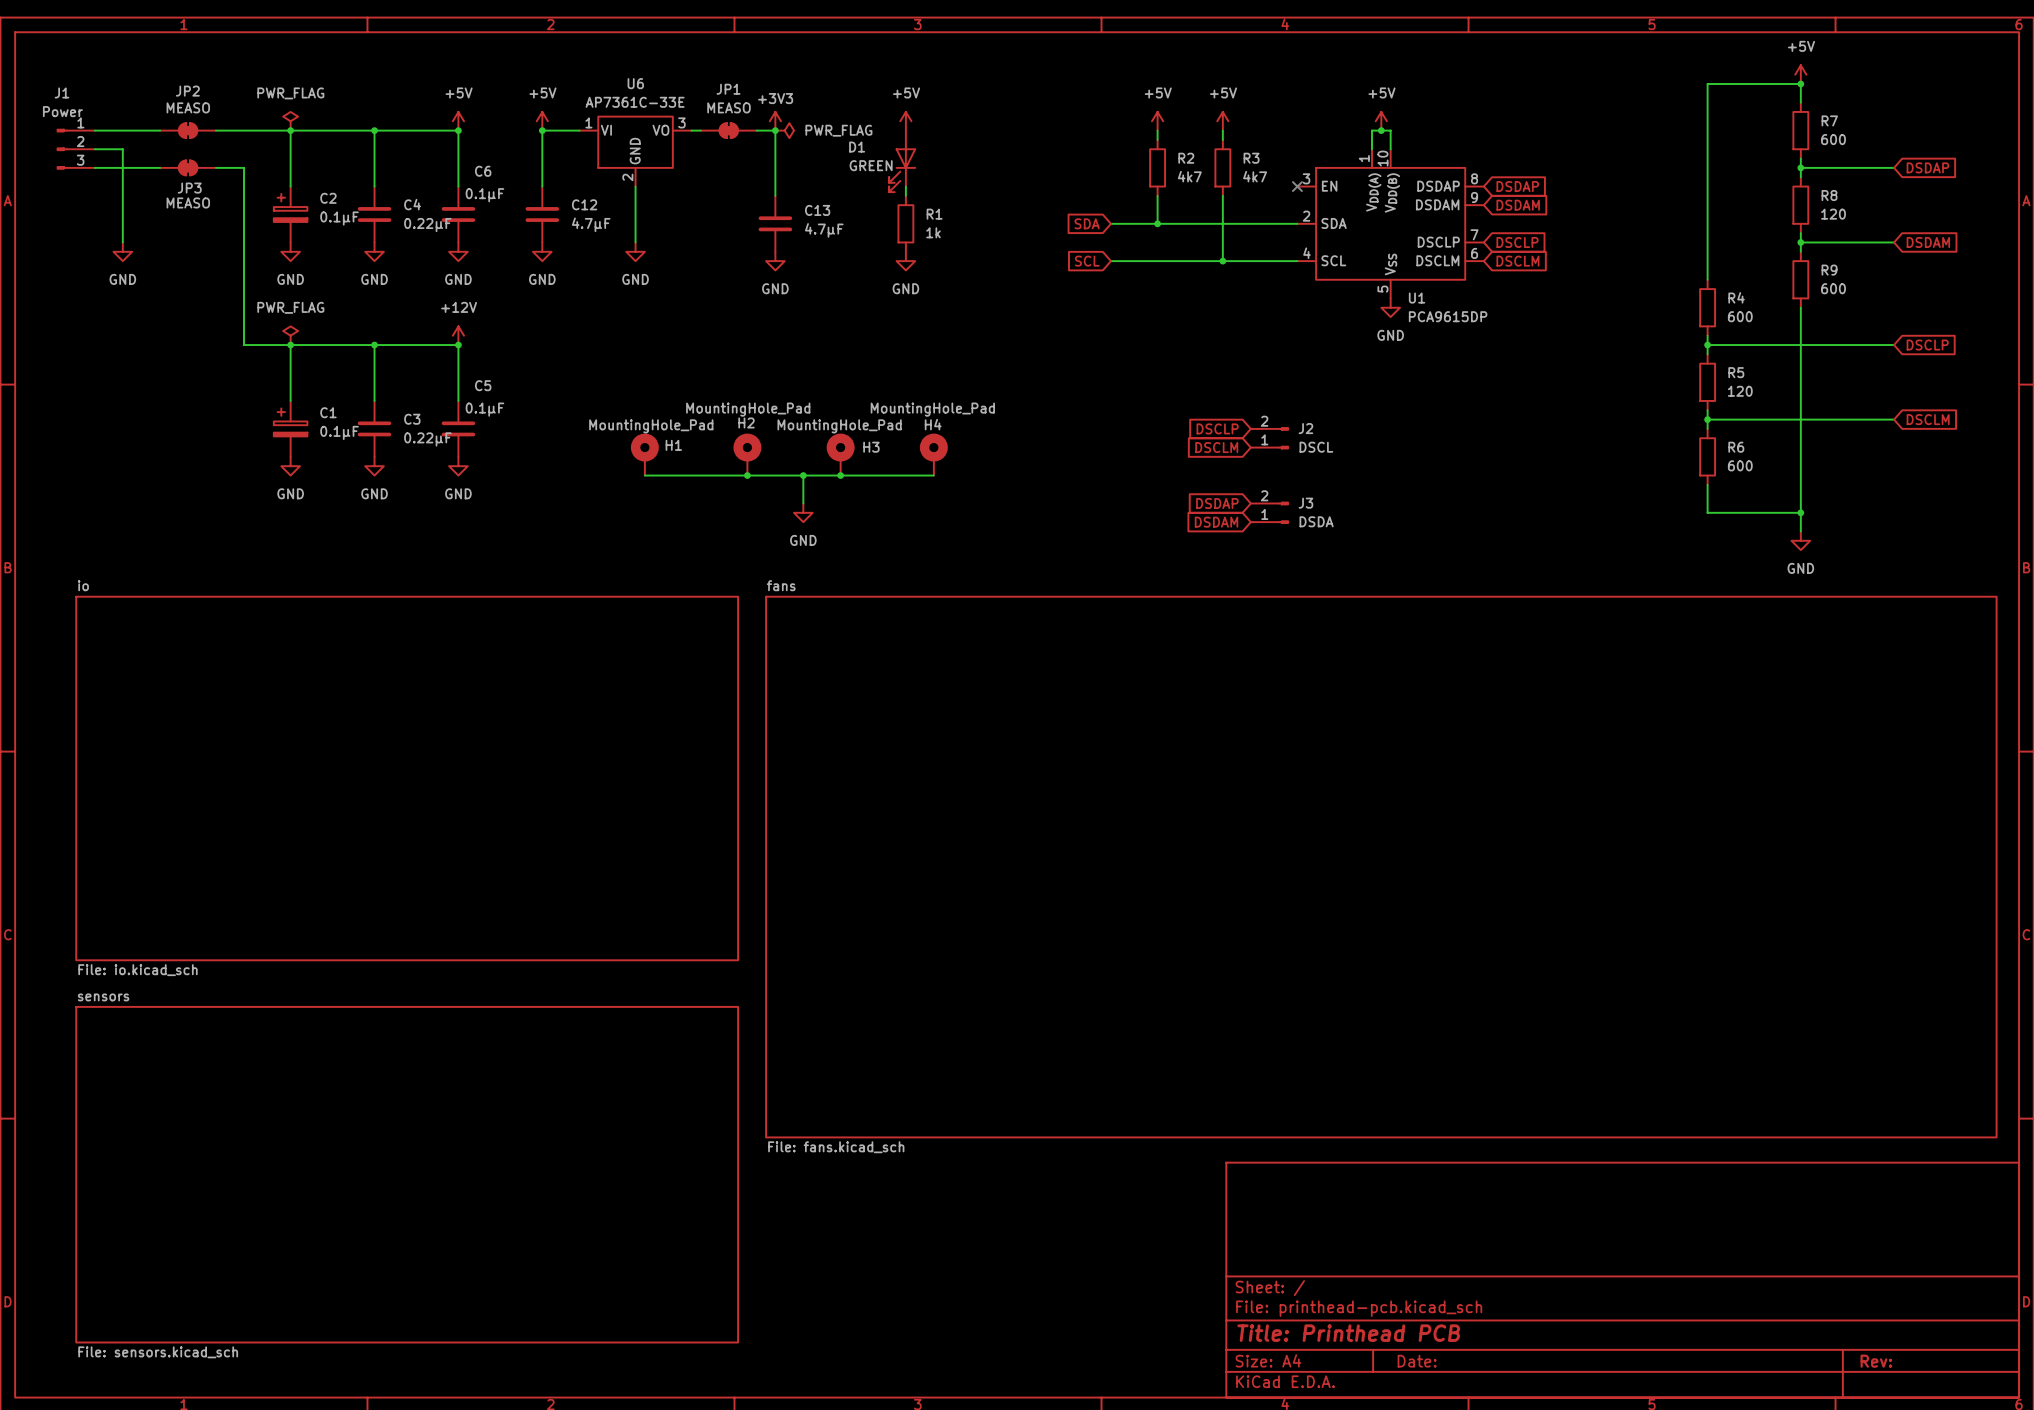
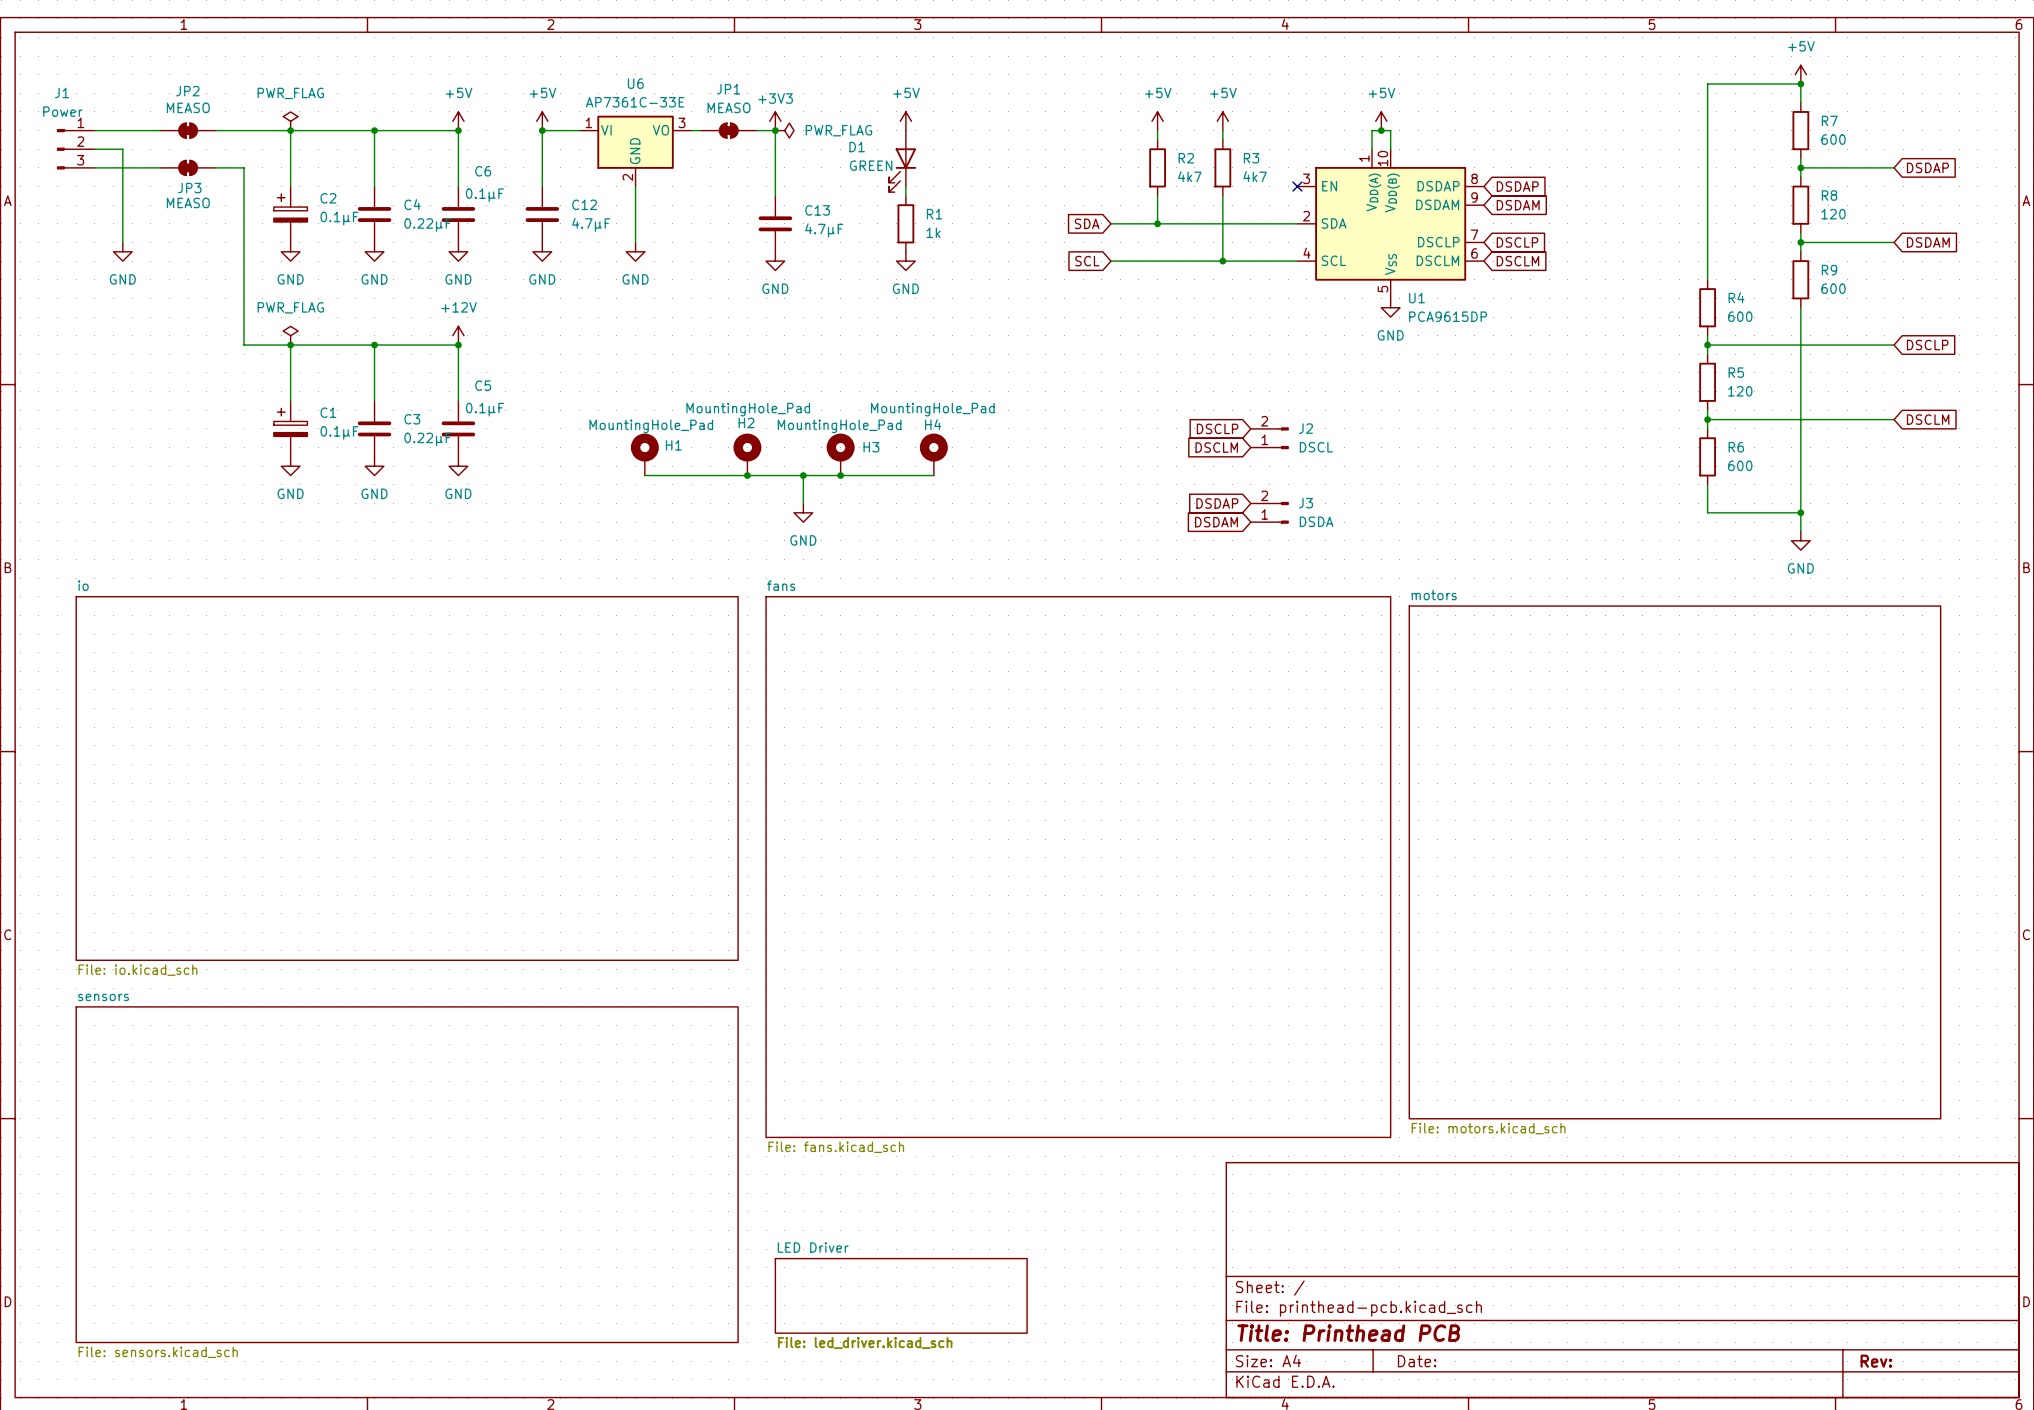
sheet motors: none -> File: motors.kicad_sch (1674, 862)
sheet fans: none -> File: fans.kicad_sch (1078, 867)
sheet fans: File: fans.kicad_sch (1381, 867) -> none
sheet LED Driver: none -> File: led_driver.kicad_sch (901, 1295)

